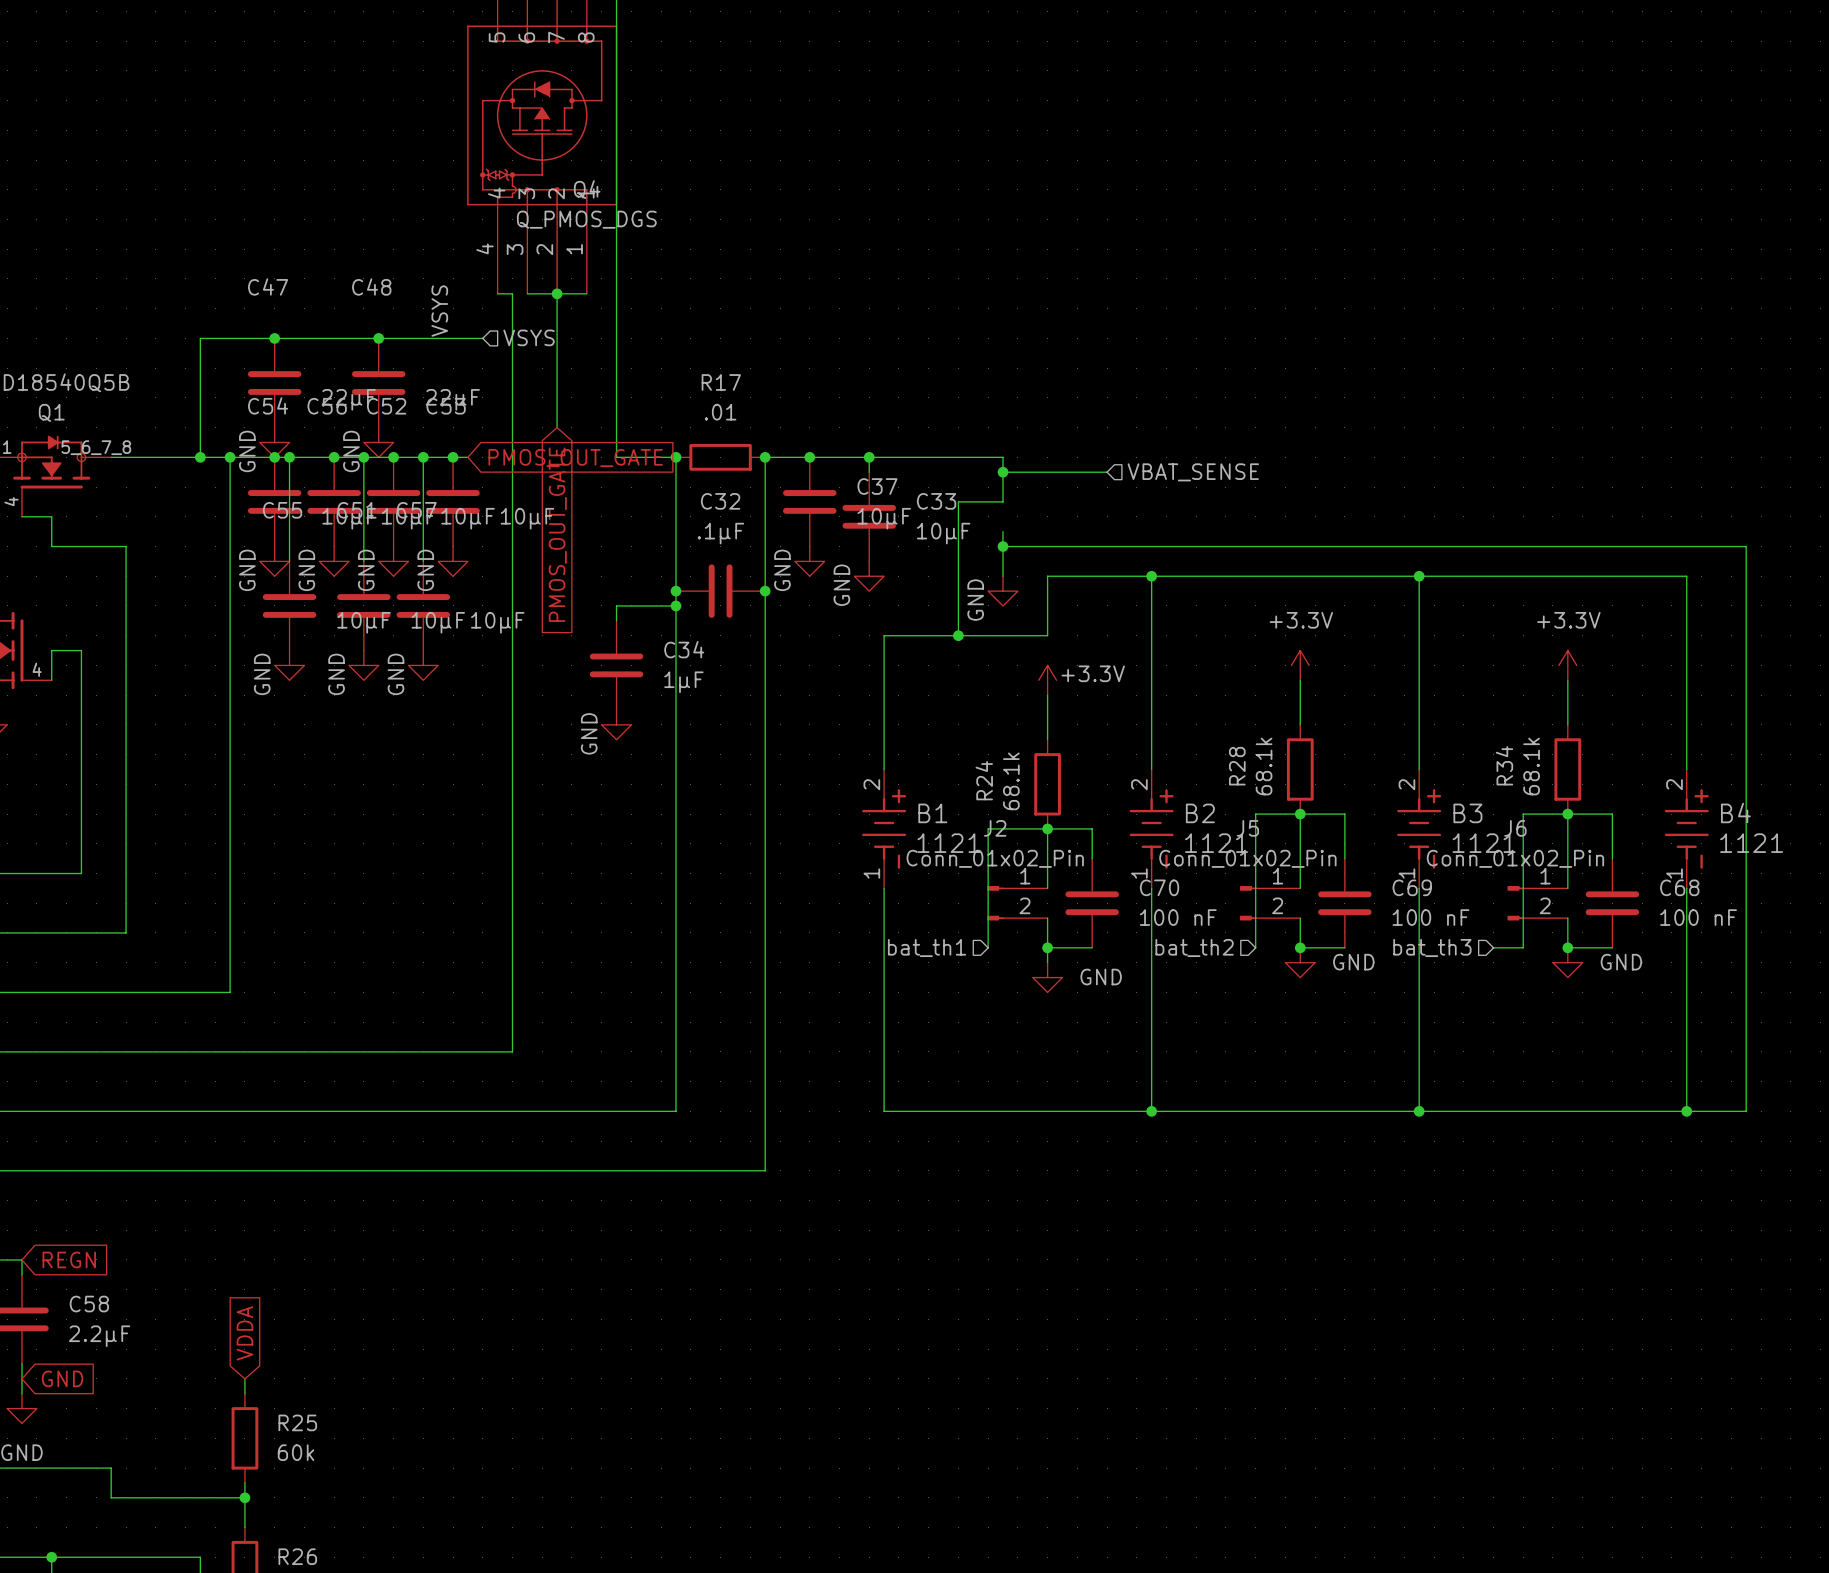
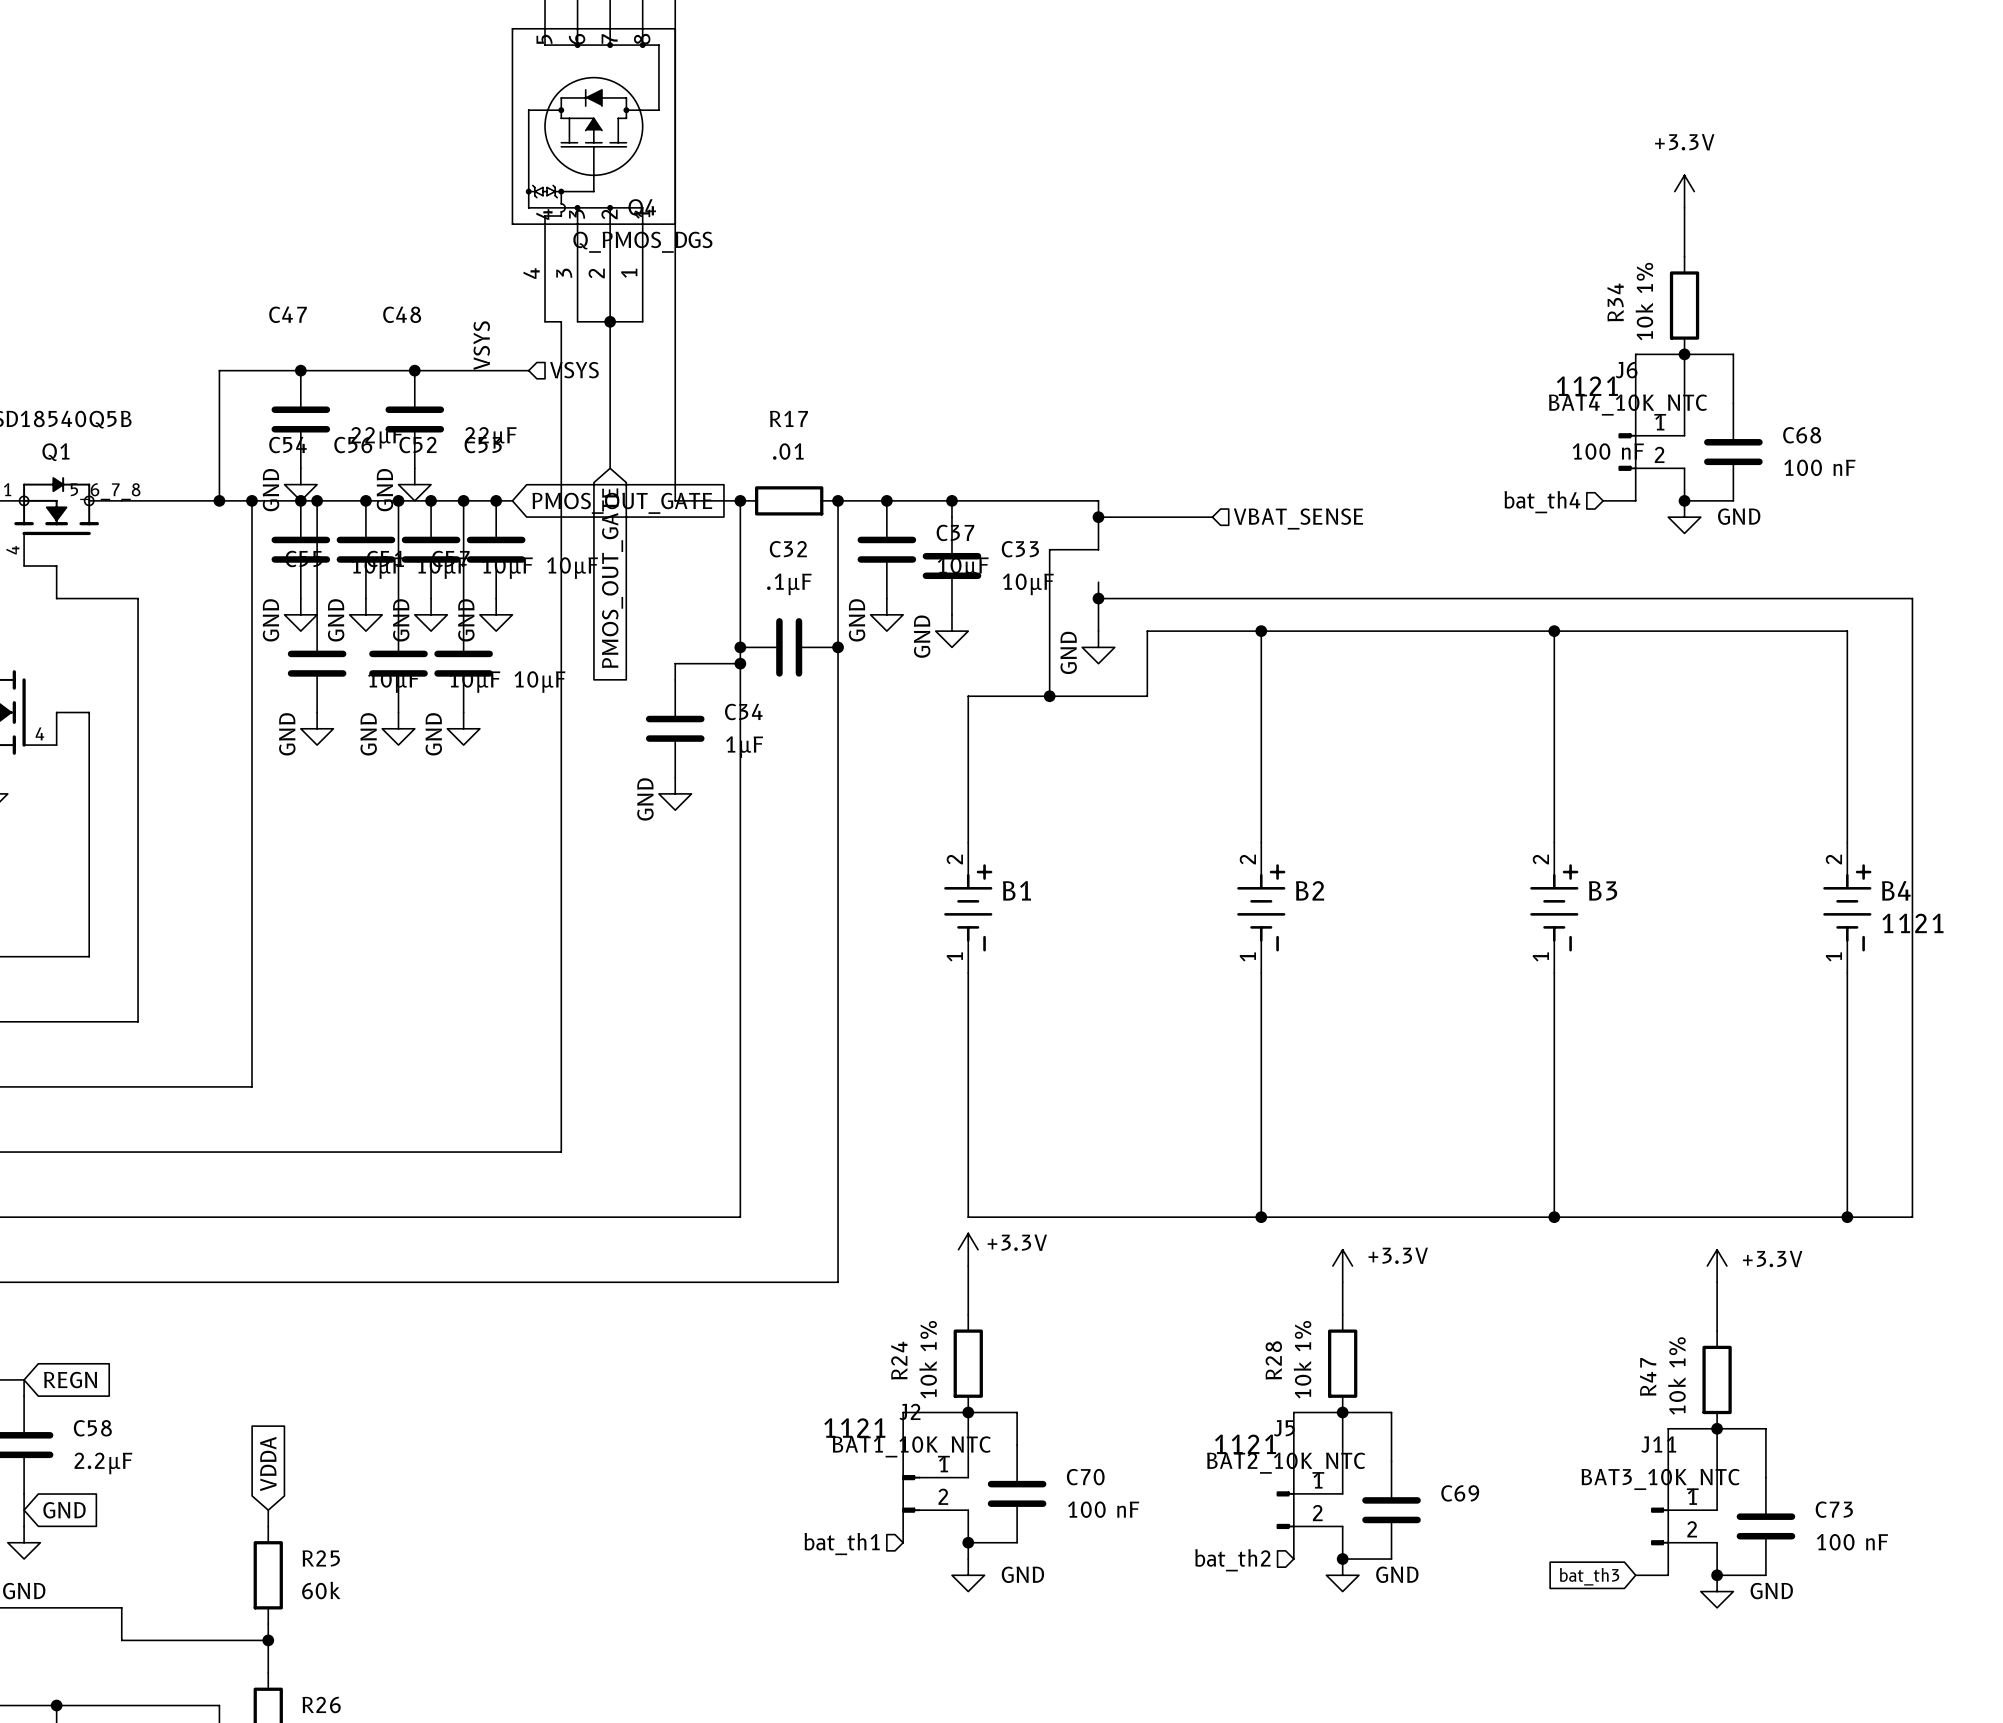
power symbol: none -> +3.3V (1684, 191)
wire: none -> (1684, 207) (1684, 256)
wire: none -> (1684, 354) (1684, 435)
junction: none -> (1684, 354)
wire: none -> (1733, 403) (1733, 354) (1635, 354) (1635, 500) (1603, 500)
wire: none -> (1684, 468) (1684, 500) (1733, 500)
hierarchical label: none -> bat_th4 (1542, 502)
junction: none -> (1684, 500)
power symbol: none -> GND (1684, 517)
power symbol: +3.3V (1300, 665) -> none
power symbol: +3.3V (1567, 665) -> none
power symbol: +3.3V (1047, 680) -> none
wire: (1300, 680) (1300, 724) -> none
wire: (1567, 680) (1567, 724) -> none
wire: (1047, 695) (1047, 739) -> none
R28 value: 68.1k (1264, 766) -> 10k 1% (1302, 1359)
R34 value: 68.1k (1531, 766) -> 10k 1% (1644, 301)
R28 position: (1300, 769) -> (1342, 1363)
R34 position: (1567, 769) -> (1684, 305)
R24 value: 68.1k (1011, 781) -> 10k 1% (928, 1359)
R24 position: (1047, 784) -> (968, 1363)
wire: (1300, 814) (1300, 888) -> none
junction: (1300, 814) -> none
wire: (1567, 814) (1567, 888) -> none
junction: (1567, 814) -> none
wire: (1047, 828) (1047, 888) -> none
junction: (1047, 828) -> none
B1 value position: 1121 (948, 843) -> 1121 (854, 1428)
B2 value position: 1121 (1216, 843) -> 1121 (1245, 1444)
B3 value position: 1121 (1484, 843) -> 1121 (1587, 386)
J2 value: Conn_01x02_Pin (995, 858) -> BAT1_10K_NTC (911, 1446)
wire: (1092, 858) (1092, 828) (988, 828) (988, 947) -> none
J5 value: Conn_01x02_Pin (1247, 858) -> BAT2_10K_NTC (1286, 1463)
wire: (1344, 858) (1344, 814) (1255, 814) (1255, 947) -> none
J6 value: Conn_01x02_Pin (1515, 858) -> BAT4_10K_NTC (1628, 405)
wire: (1612, 858) (1612, 814) (1523, 814) (1523, 947) (1493, 947) -> none
J2 position: (1017, 903) -> (935, 1493)
C70 position: (1092, 903) -> (1017, 1493)
J5 position: (1270, 903) -> (1309, 1510)
C69 position: (1344, 903) -> (1391, 1510)
J6 position: (1537, 903) -> (1651, 452)
C68 position: (1612, 903) -> (1733, 452)
C69 value position: 100 nF (1430, 917) -> 100 nF (1608, 451)
wire: (1047, 918) (1047, 962) -> (968, 1265) (968, 1314)
wire: (1300, 918) (1300, 947) (1344, 947) -> none
wire: (1567, 918) (1567, 947) (1612, 947) -> none
wire: (1047, 947) (1092, 947) -> none
junction: (1047, 947) -> none
junction: (1300, 947) -> none
junction: (1567, 947) -> none
hierarchical label: bat_th1 (927, 948) -> none
hierarchical label: bat_th2 (1194, 948) -> none
hierarchical label: bat_th3 (1432, 948) -> none
power symbol: GND (1300, 962) -> none
power symbol: GND (1567, 962) -> none
power symbol: GND (1047, 977) -> none
power symbol: none -> +3.3V (968, 1249)
power symbol: none -> +3.3V (1342, 1265)
power symbol: none -> +3.3V (1717, 1265)
wire: none -> (1342, 1282) (1342, 1314)
wire: none -> (1717, 1282) (1717, 1331)
R47: none -> 10k 1% (1717, 1379)
wire: none -> (968, 1412) (968, 1477)
junction: none -> (968, 1412)
wire: none -> (1342, 1412) (1342, 1493)
junction: none -> (1342, 1412)
wire: none -> (1717, 1428) (1717, 1510)
junction: none -> (1717, 1428)
wire: none -> (1017, 1445) (1017, 1412) (903, 1412) (903, 1542)
wire: none -> (1391, 1461) (1391, 1412) (1293, 1412) (1293, 1559)
wire: none -> (1765, 1477) (1765, 1428) (1668, 1428) (1668, 1575) (1635, 1575)
wire: none -> (968, 1510) (968, 1559)
wire: none -> (1342, 1526) (1342, 1559) (1391, 1559)
J11: none -> BAT3_10K_NTC (1684, 1526)
C73: none -> 100 nF (1765, 1526)
hierarchical label: none -> bat_th1 (842, 1544)
wire: none -> (968, 1542) (1017, 1542)
junction: none -> (968, 1542)
wire: none -> (1717, 1542) (1717, 1575) (1765, 1575)
hierarchical label: none -> bat_th2 (1232, 1560)
junction: none -> (1342, 1559)
power symbol: none -> GND (968, 1575)
power symbol: none -> GND (1342, 1575)
global label: none -> bat_th3 (1589, 1576)
junction: none -> (1717, 1575)
power symbol: none -> GND (1717, 1591)

